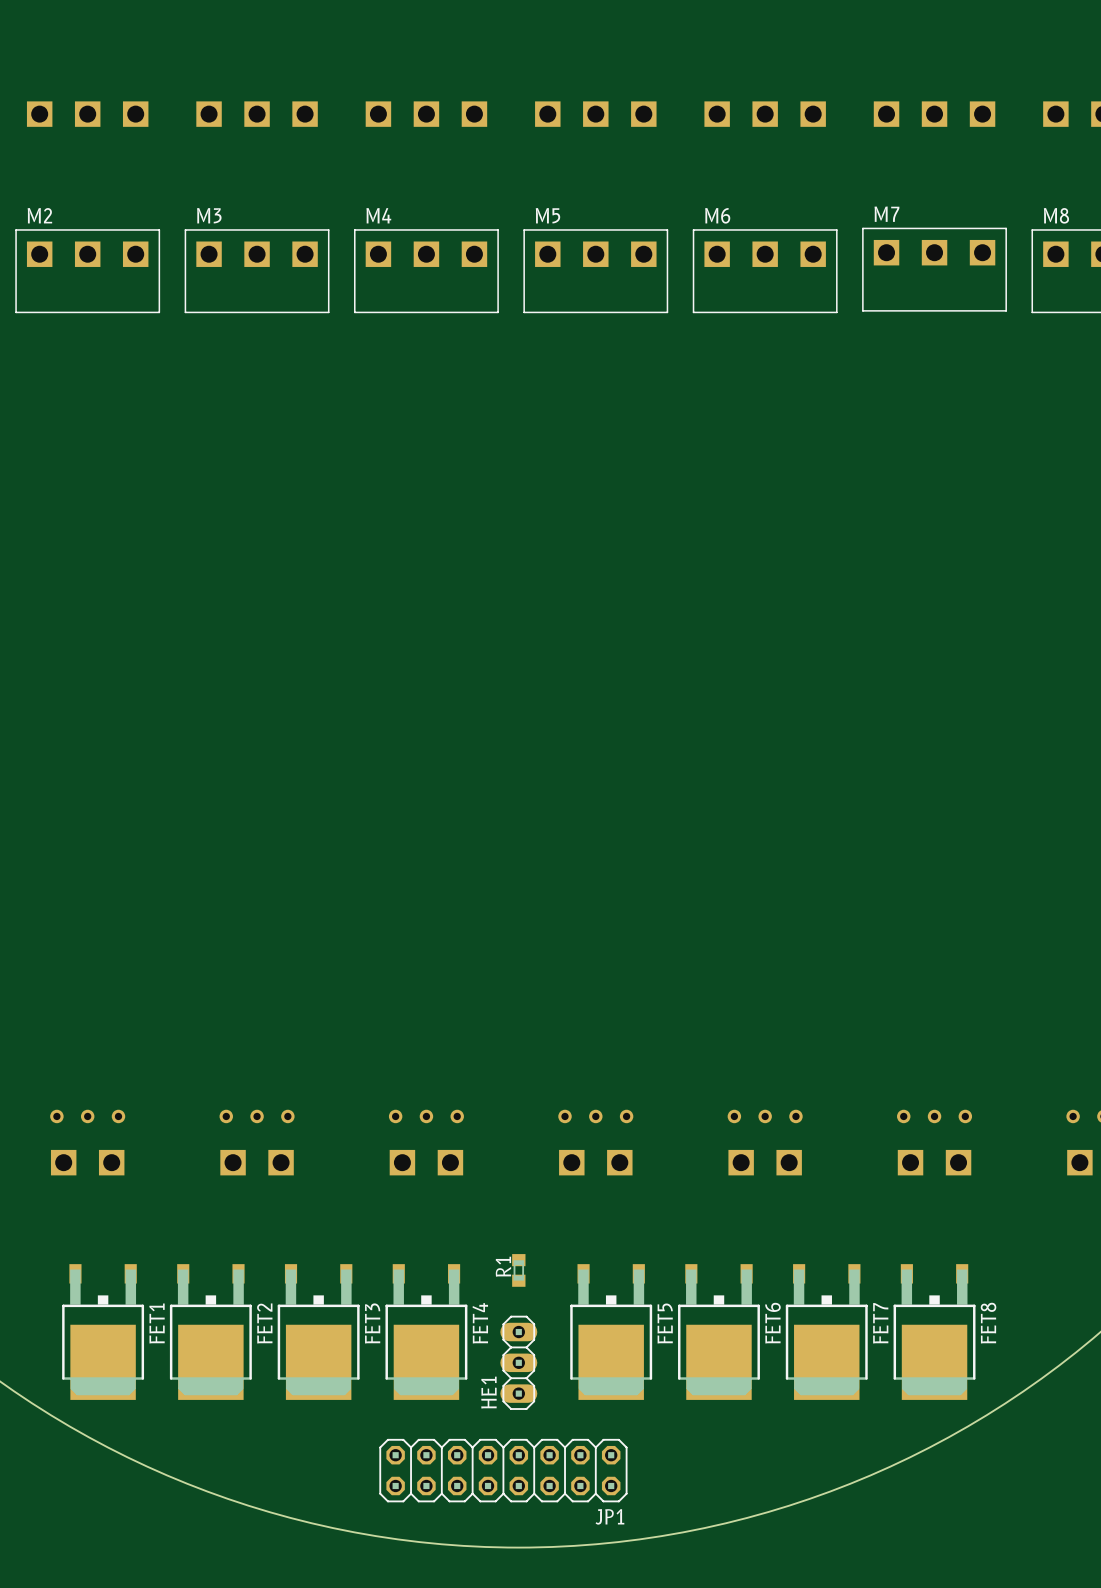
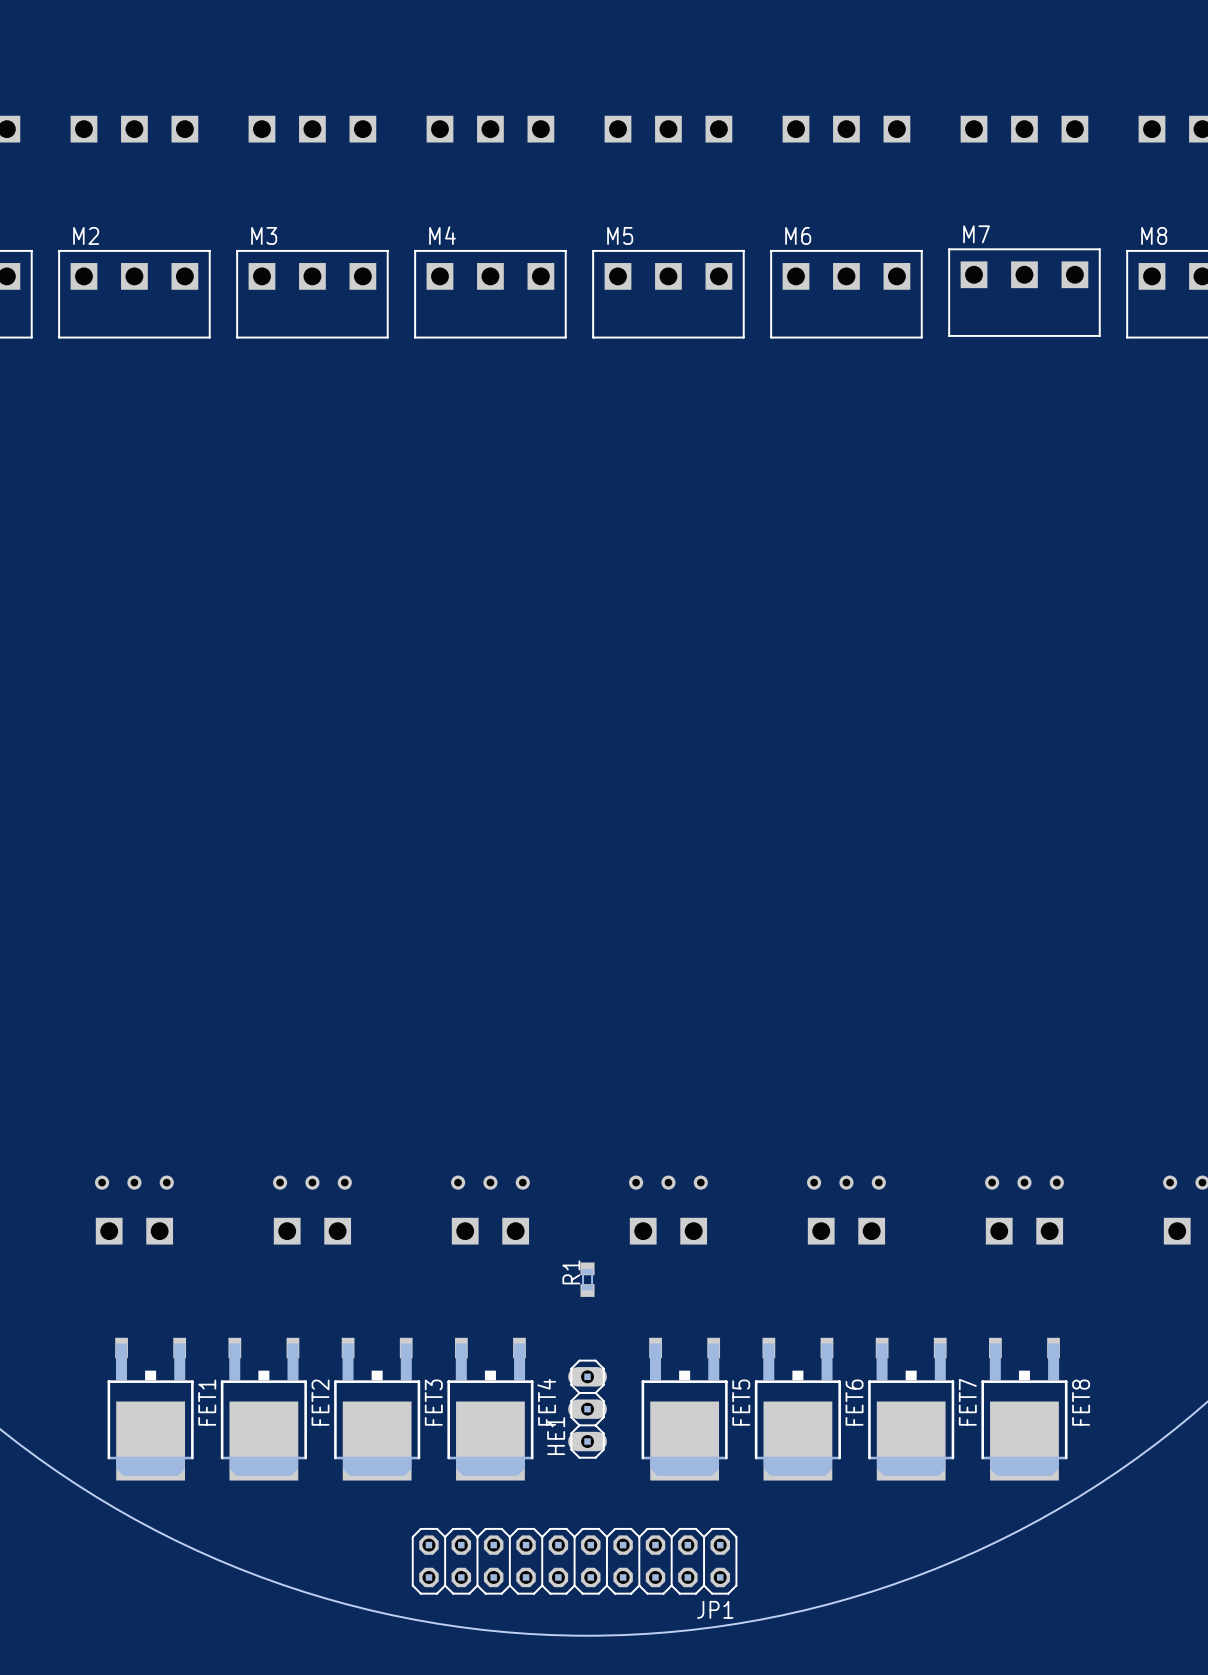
R1 position: (518, 1270) -> (587, 1279)
HE1 position: (518, 1362) -> (587, 1409)
JP1 footprint: [379, 1438, 628, 1503] -> [411, 1527, 738, 1595]
JP1 name position: JP1 (609, 1516) -> JP1 (715, 1609)

